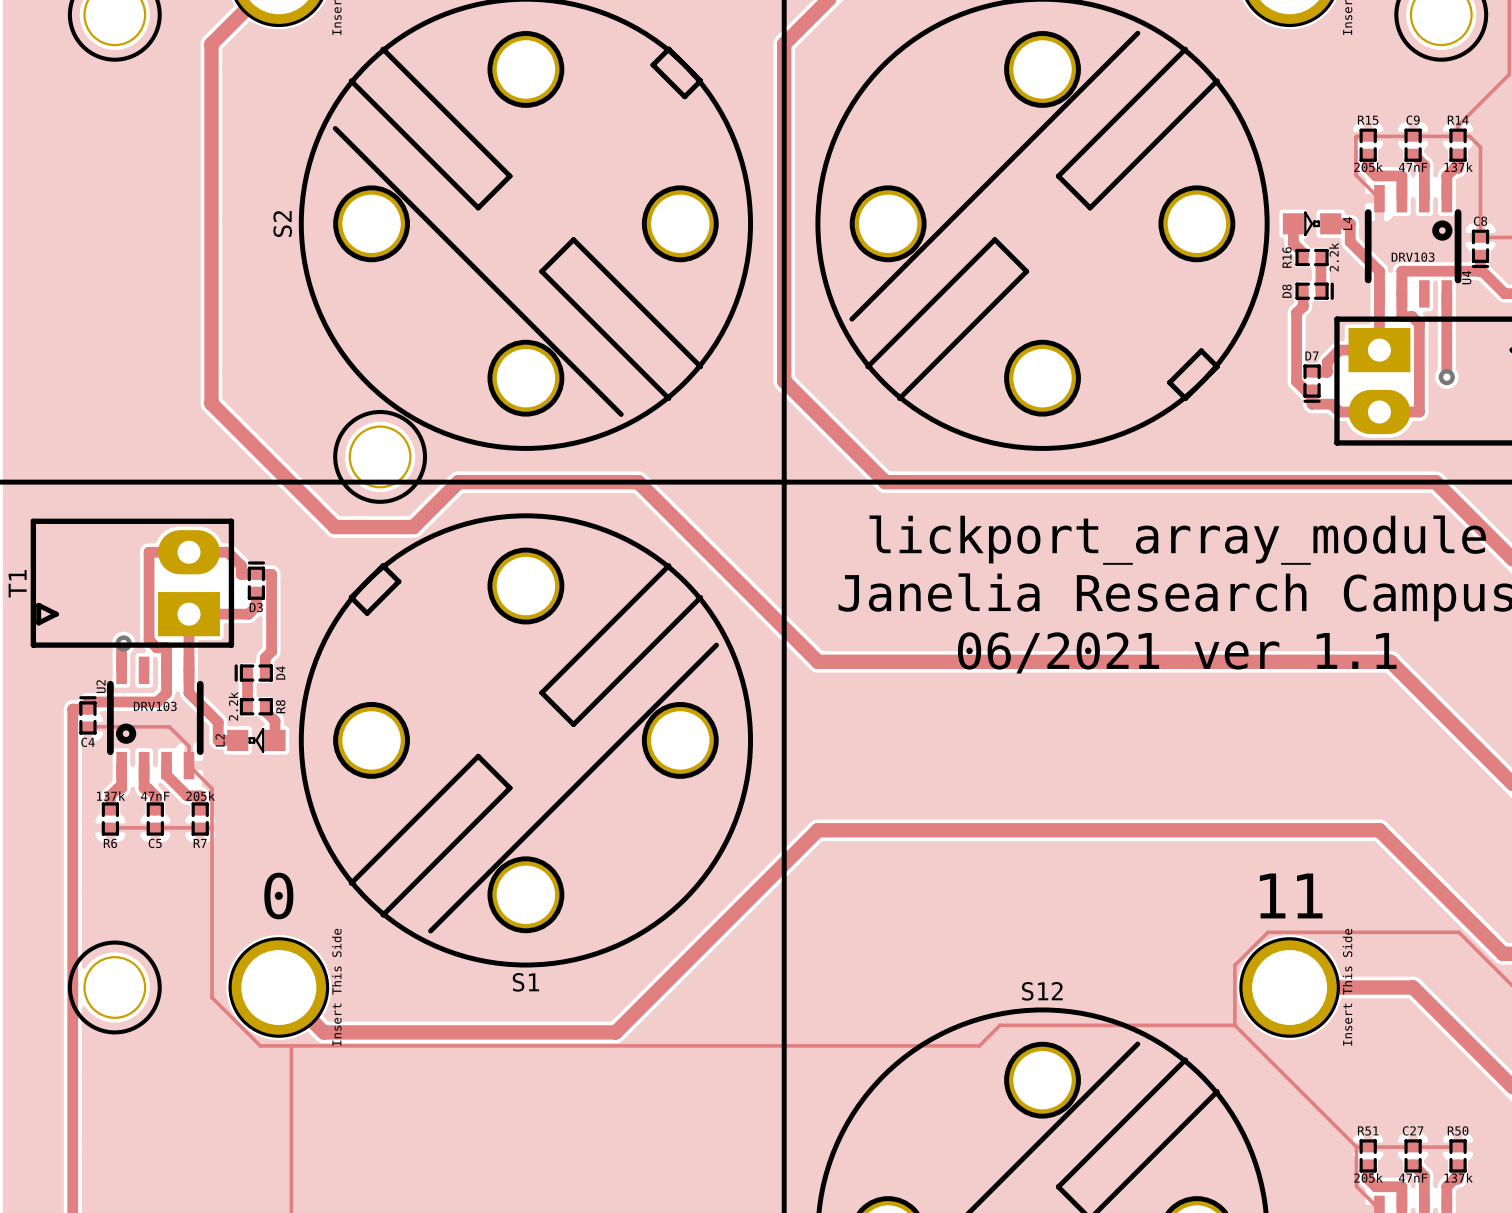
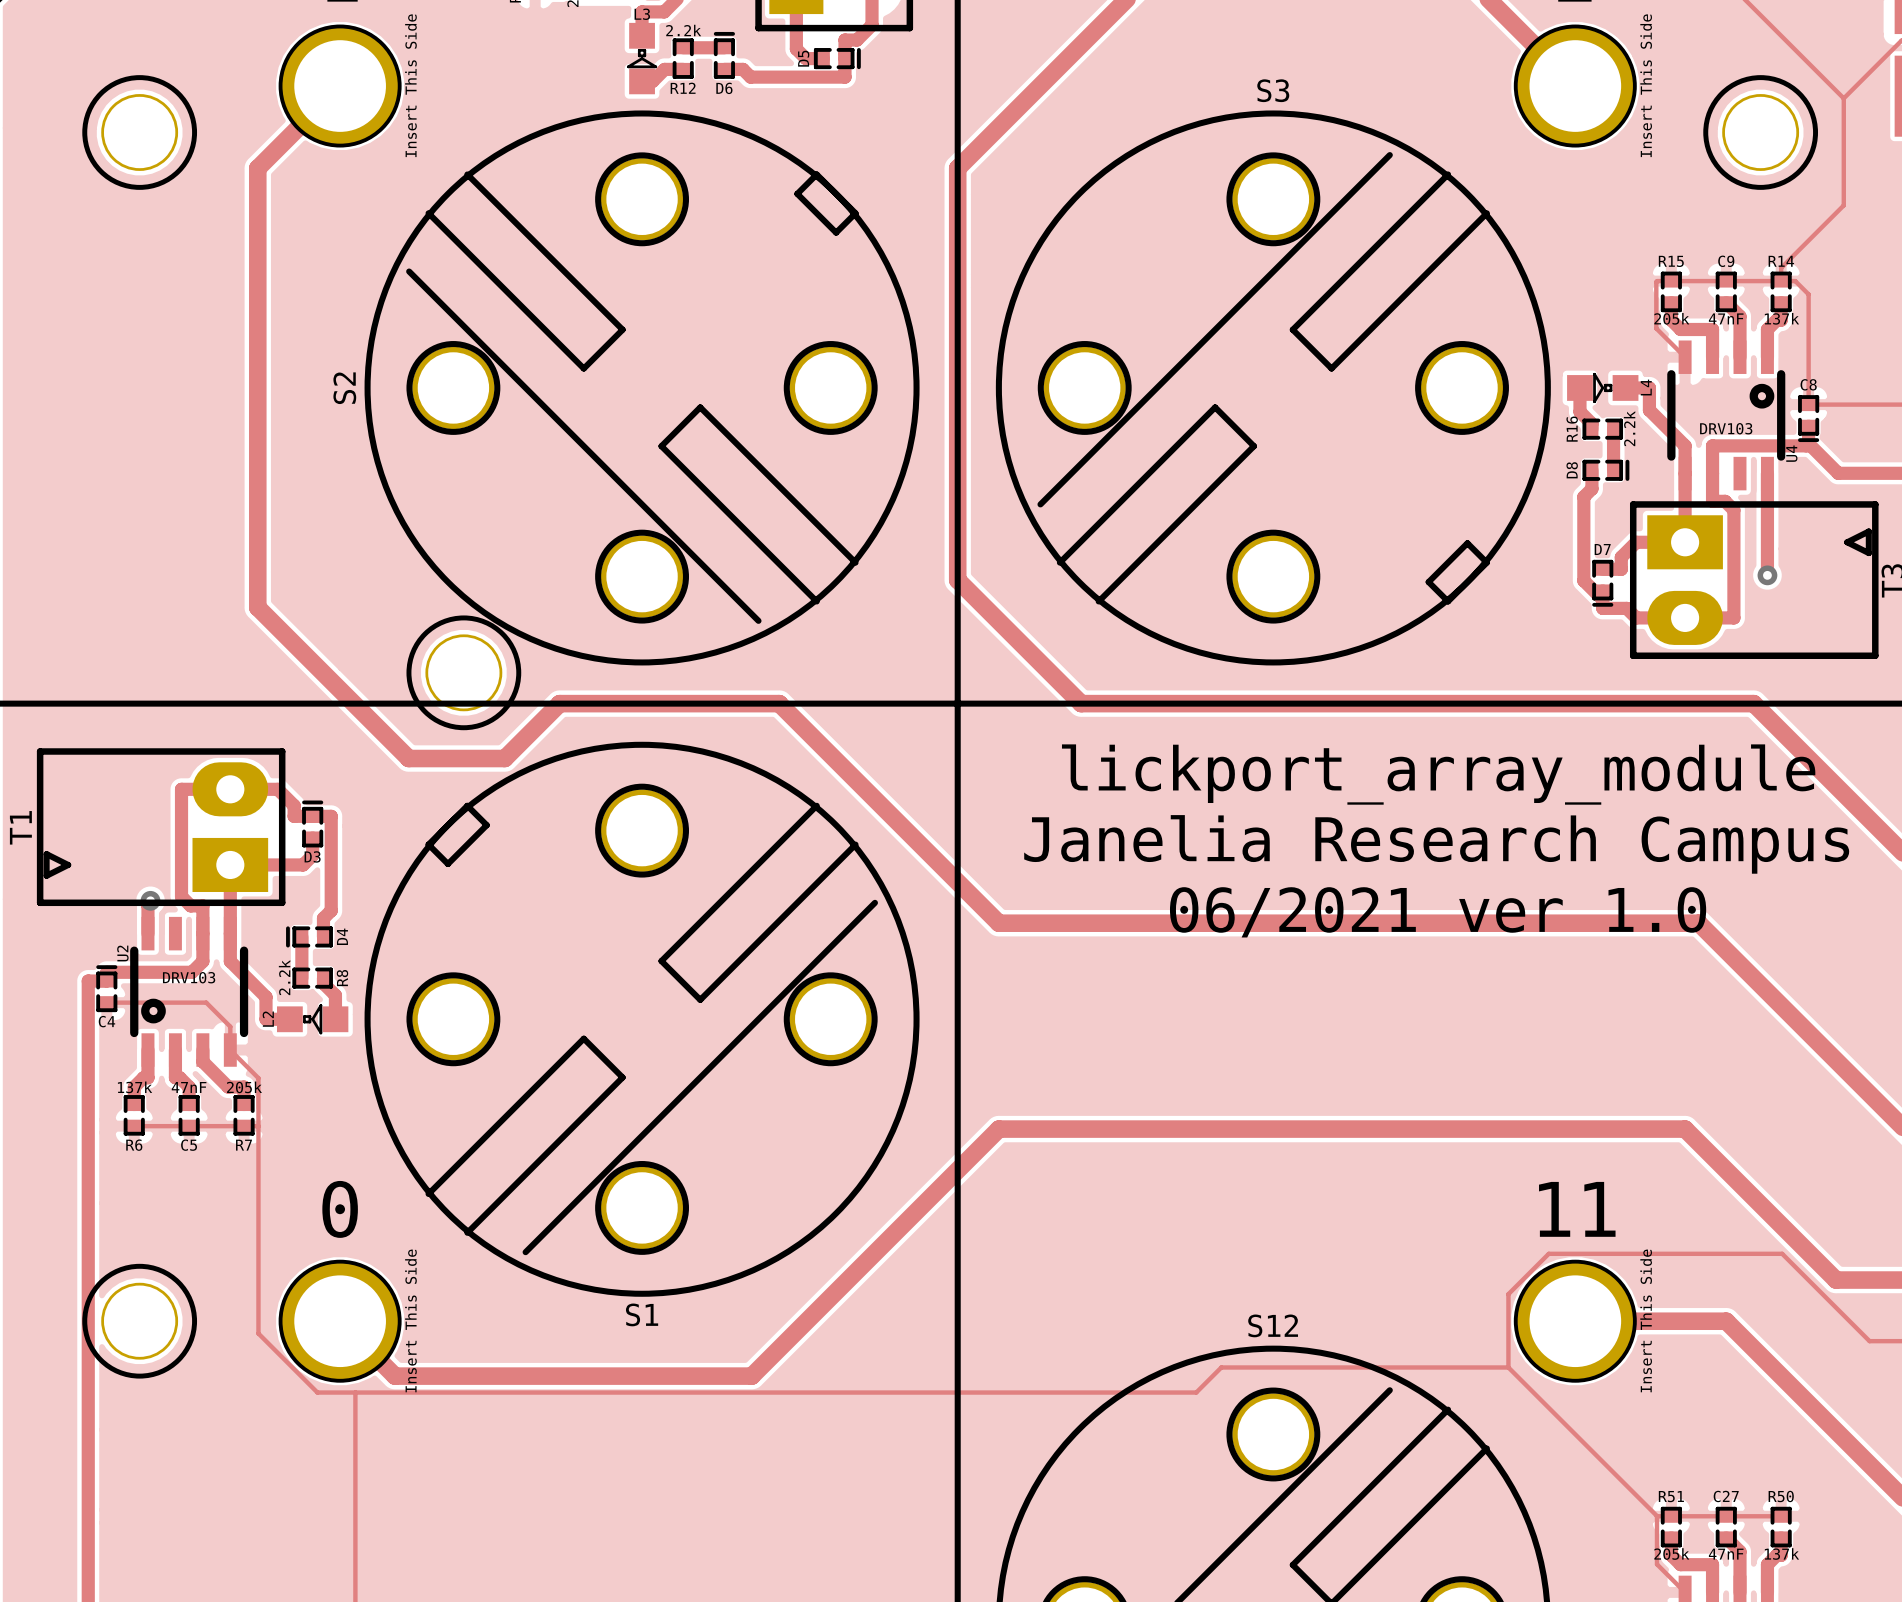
text: 06/2021 ver 1.1 (1177, 652) -> 06/2021 ver 1.0 (1438, 912)

